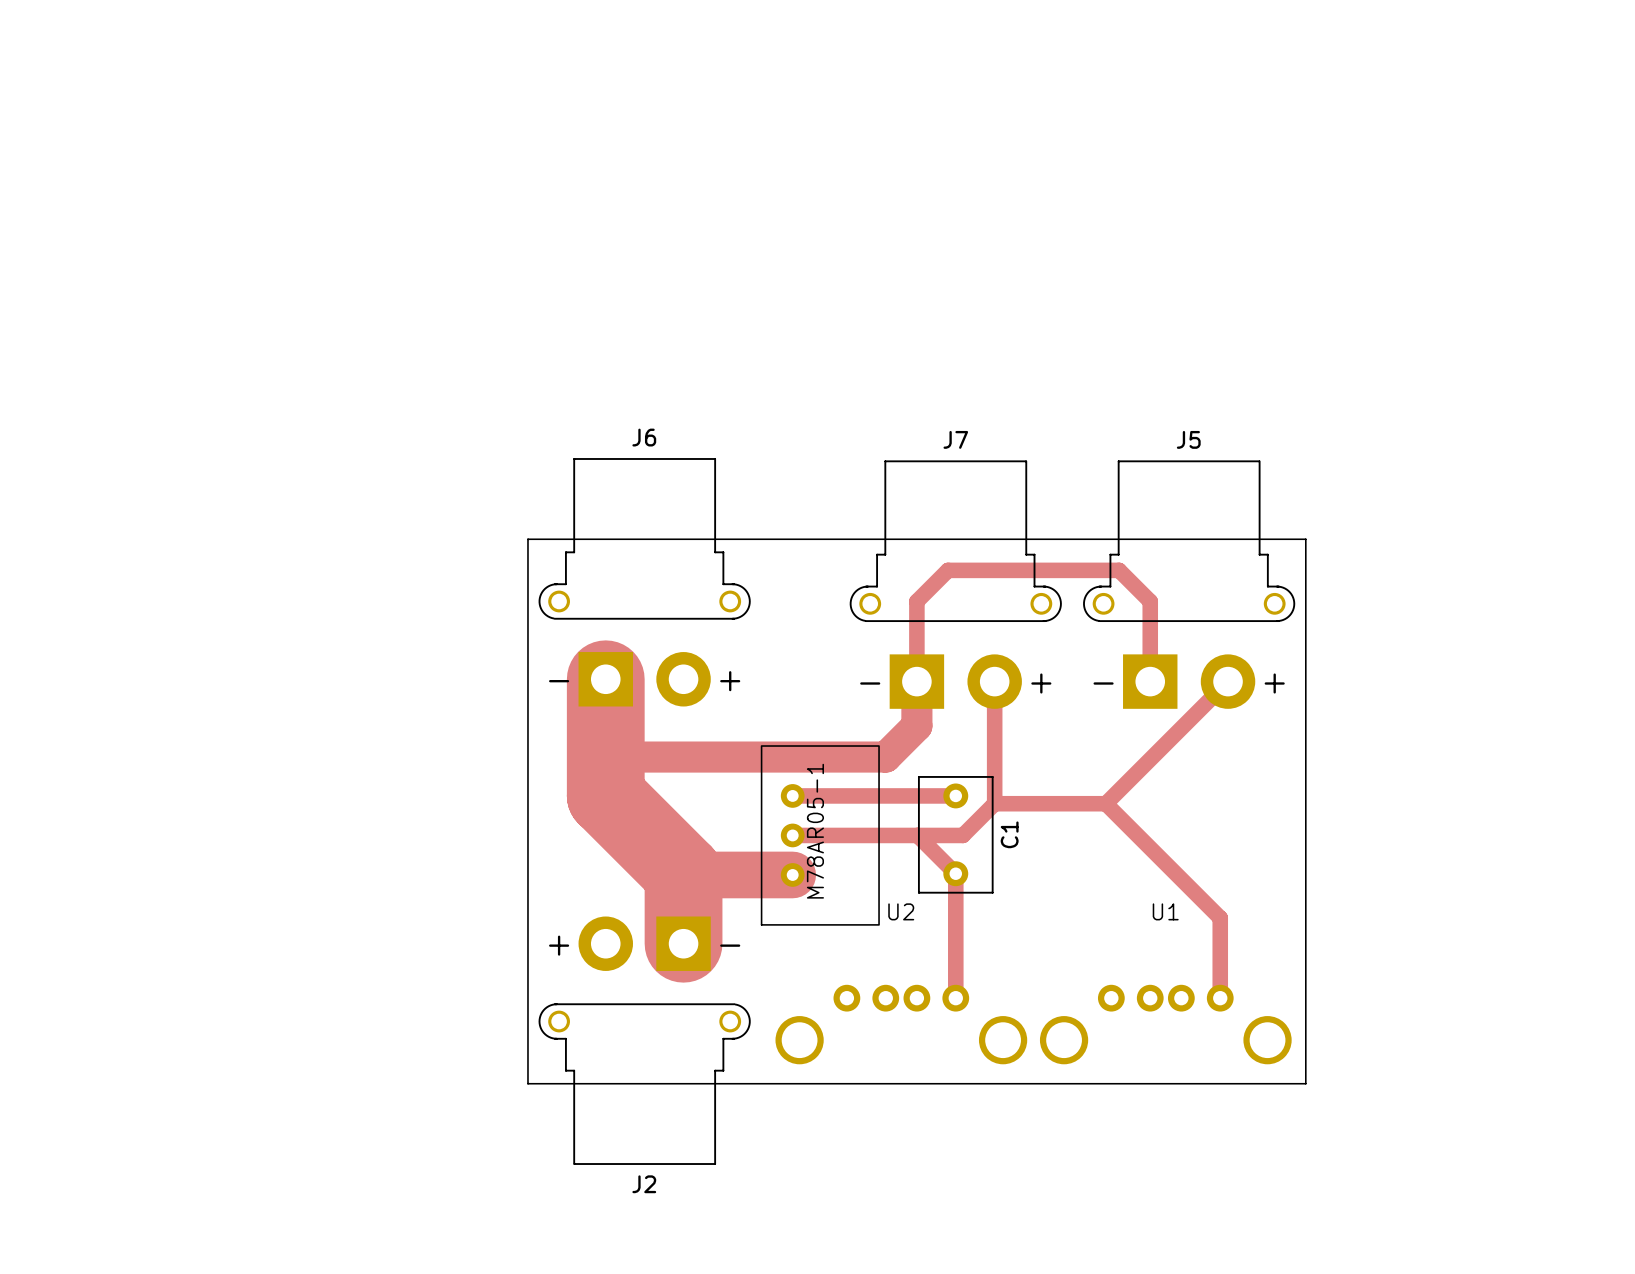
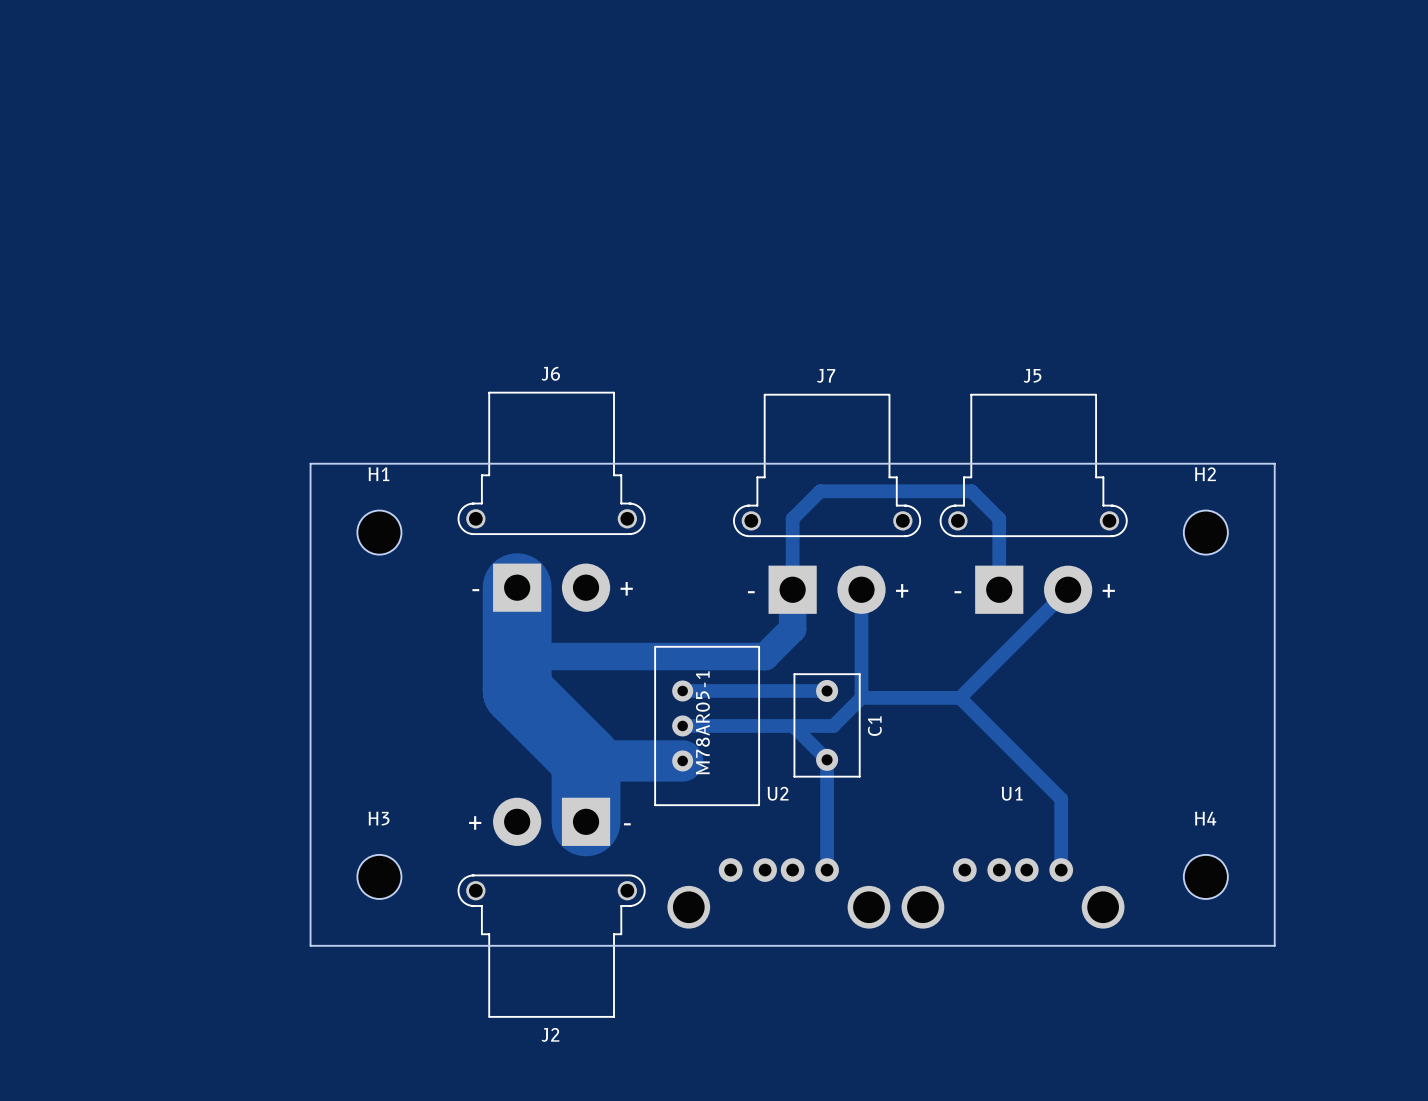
board edge: (527, 539) (527, 1083) -> (448, 463) (310, 463) (310, 945) (448, 945)
board edge: (1305, 539) (1305, 1083) -> (1136, 463) (1274, 463) (1274, 945) (1136, 945)
H1: none -> (379, 532)
H2: none -> (1205, 532)
H3: none -> (379, 876)
H4: none -> (1205, 876)

